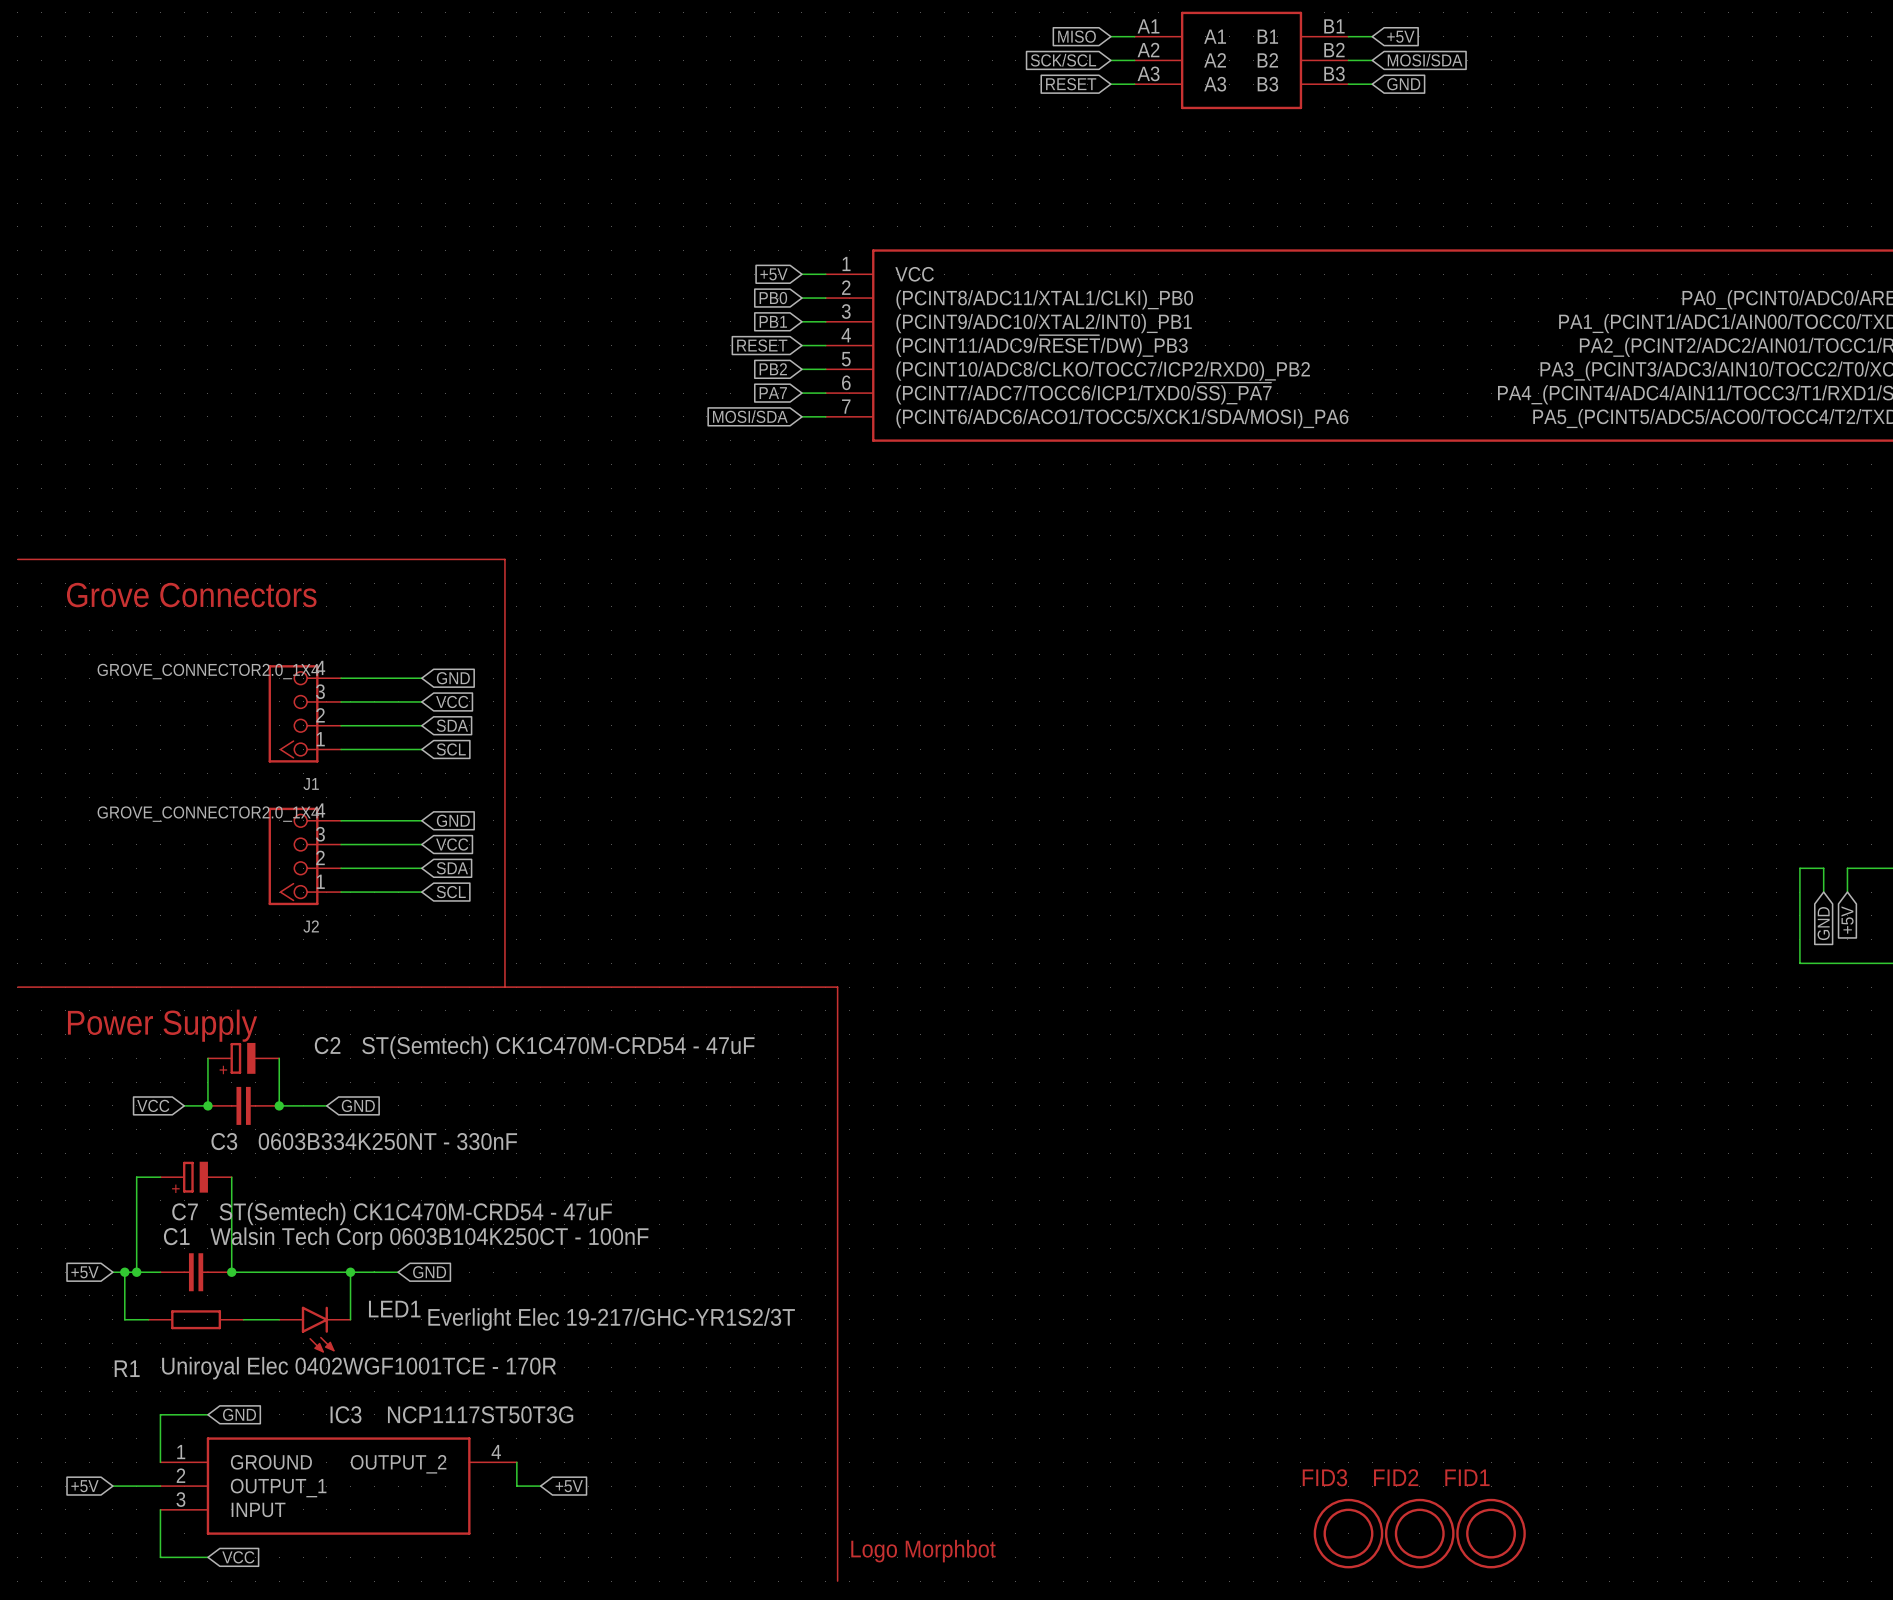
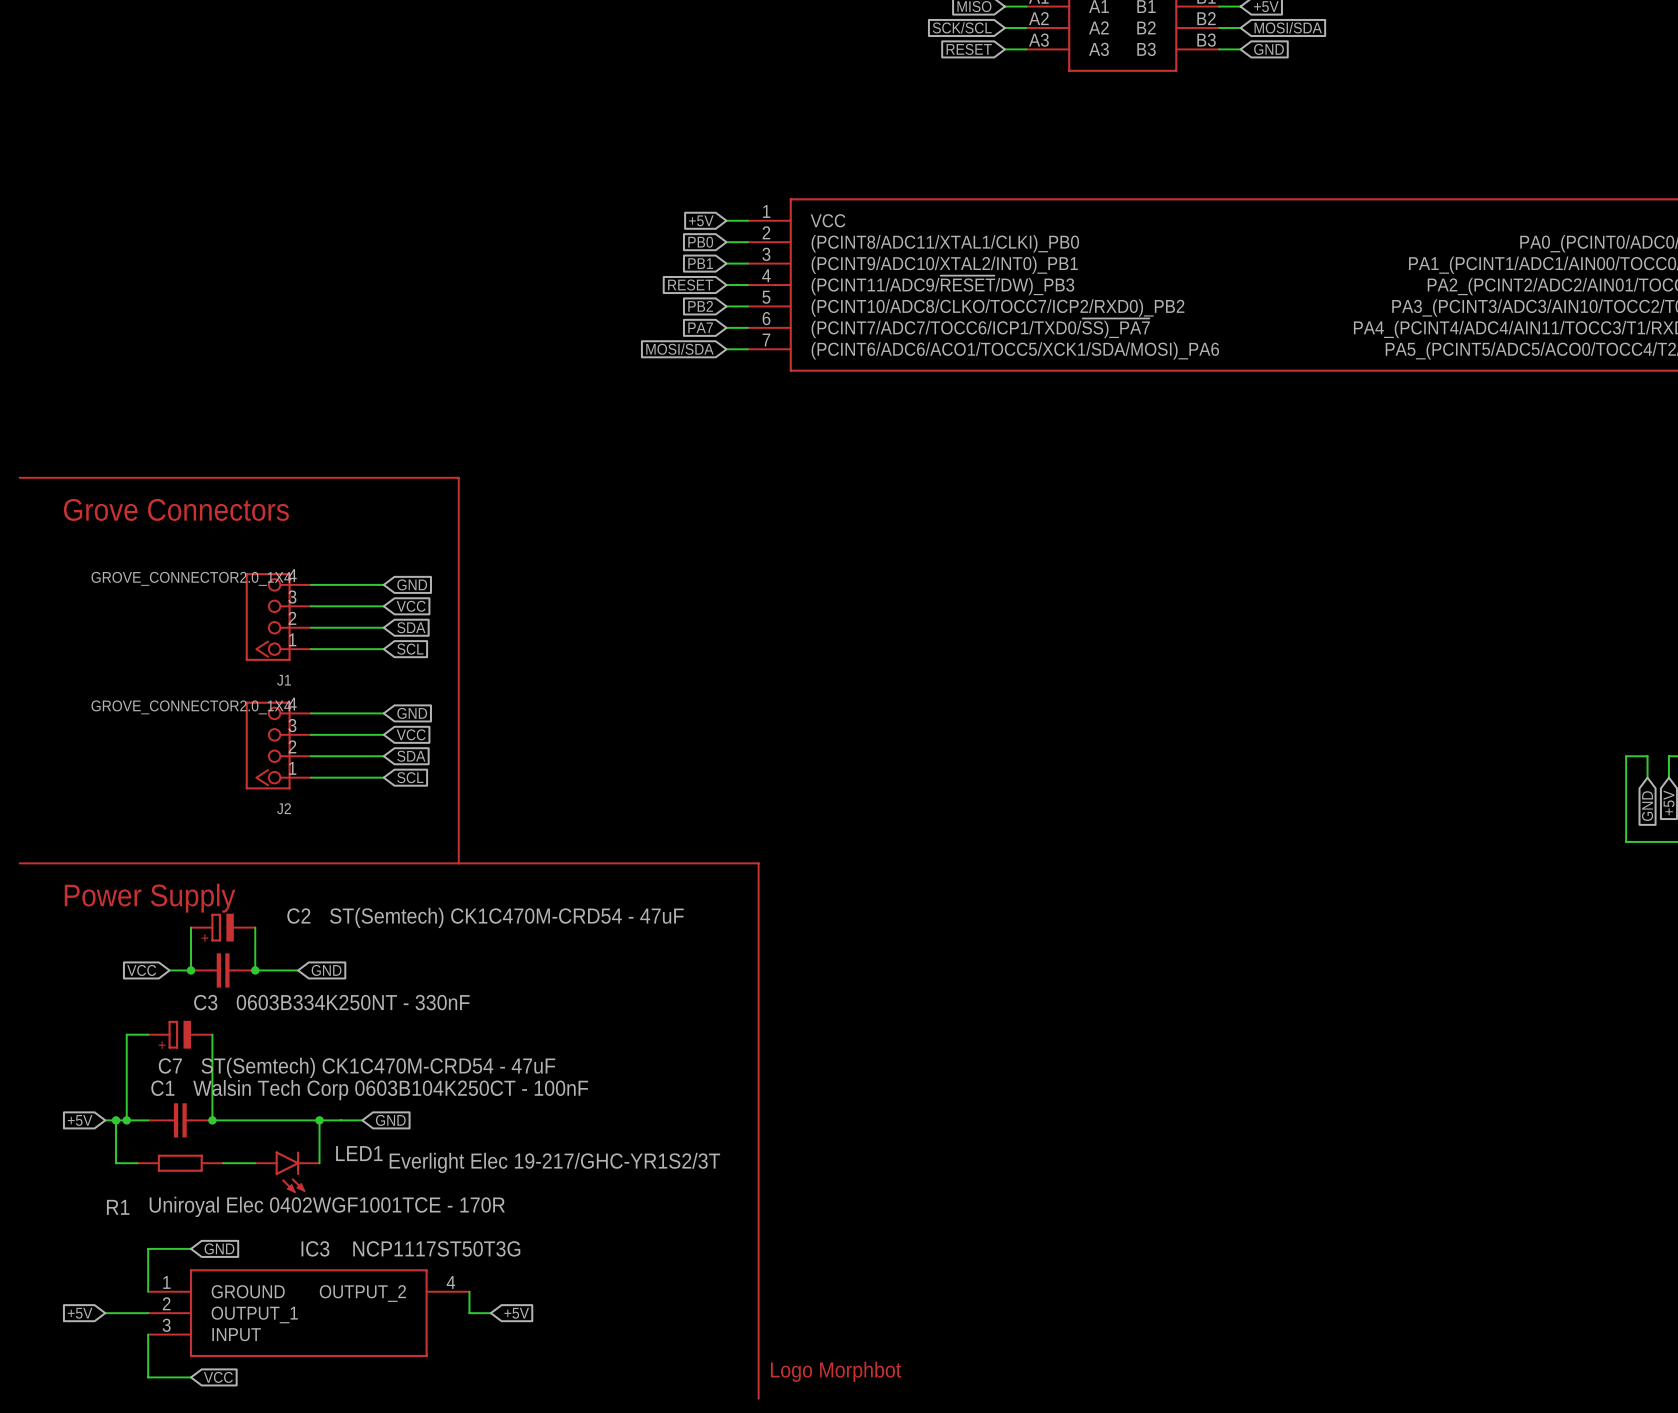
FID3: (1348, 1533) -> none
FID2: (1419, 1533) -> none
FID1: (1491, 1533) -> none

